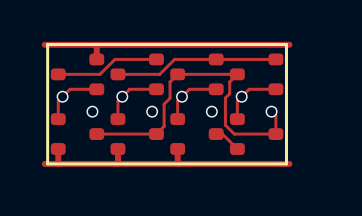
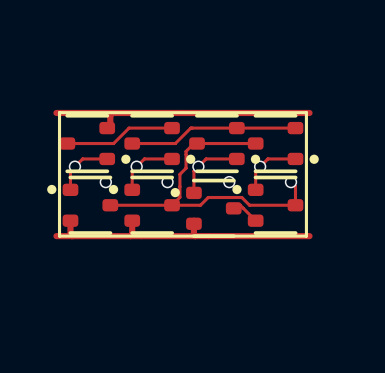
part footprint: [50, 53, 105, 96] -> [59, 113, 131, 174]
part footprint: [110, 53, 164, 96] -> [124, 113, 196, 174]
part footprint: [170, 53, 224, 96] -> [189, 113, 261, 174]
part footprint: [229, 53, 284, 96] -> [247, 113, 319, 174]
top track: (237, 74) (229, 81) (229, 93) (225, 98) (225, 125) (234, 134) -> (172, 205) (200, 205) (208, 197) (241, 197) (249, 205) (252, 205)
part footprint: [50, 113, 105, 155] -> [47, 175, 119, 235]
part footprint: [110, 113, 164, 155] -> [108, 175, 180, 235]
part footprint: [170, 113, 224, 155] -> [170, 178, 242, 238]
part footprint: [229, 113, 284, 155] -> [232, 175, 304, 235]

